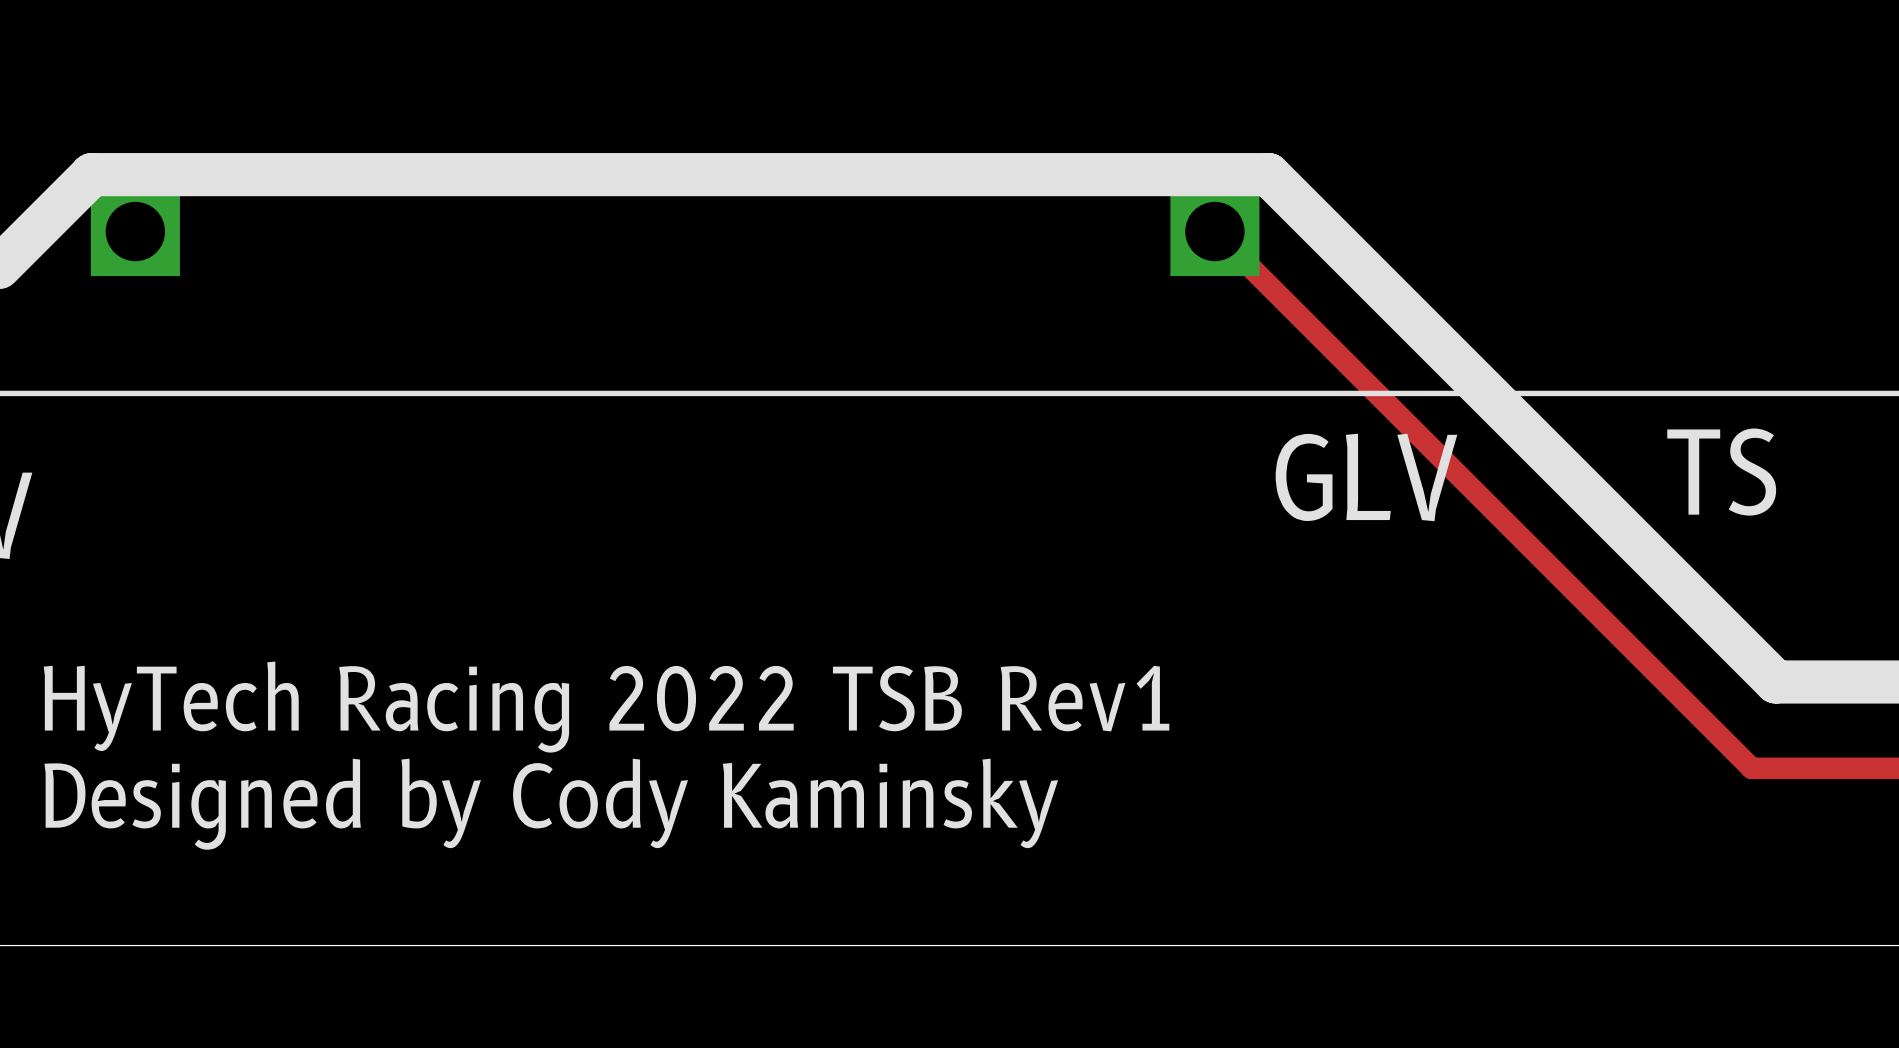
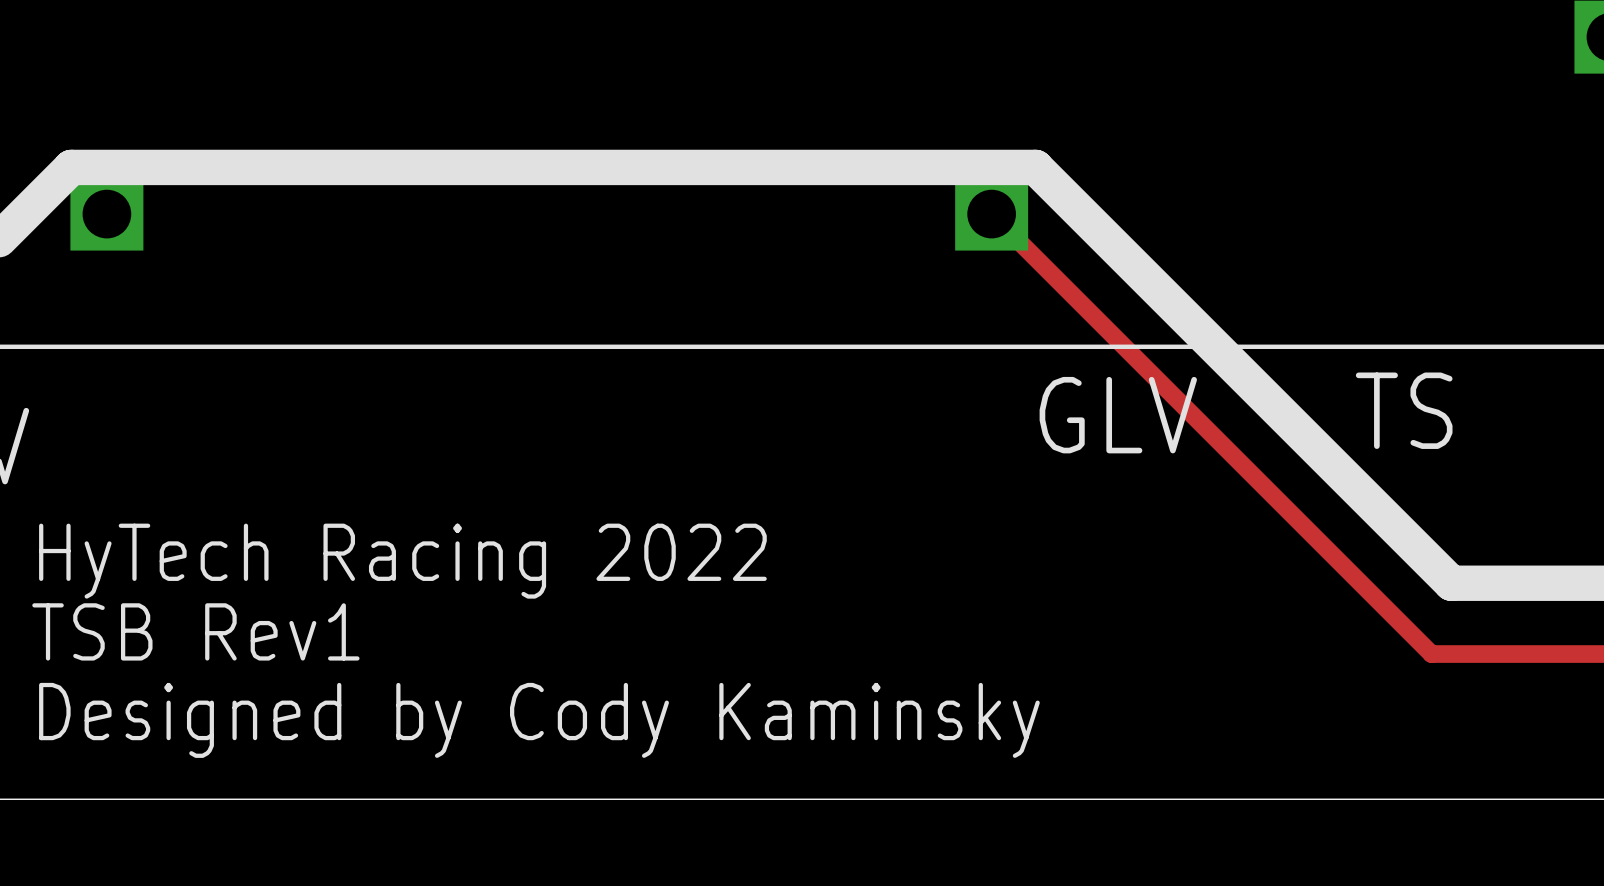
text: HyTech Racing 2022 TSB Rev1 (606, 707) -> HyTech Racing 2022 (402, 561)
text: none -> TSB Rev1 (195, 631)
text position: Designed by Cody Kaminsky (551, 804) -> Designed by Cody Kaminsky (539, 720)

